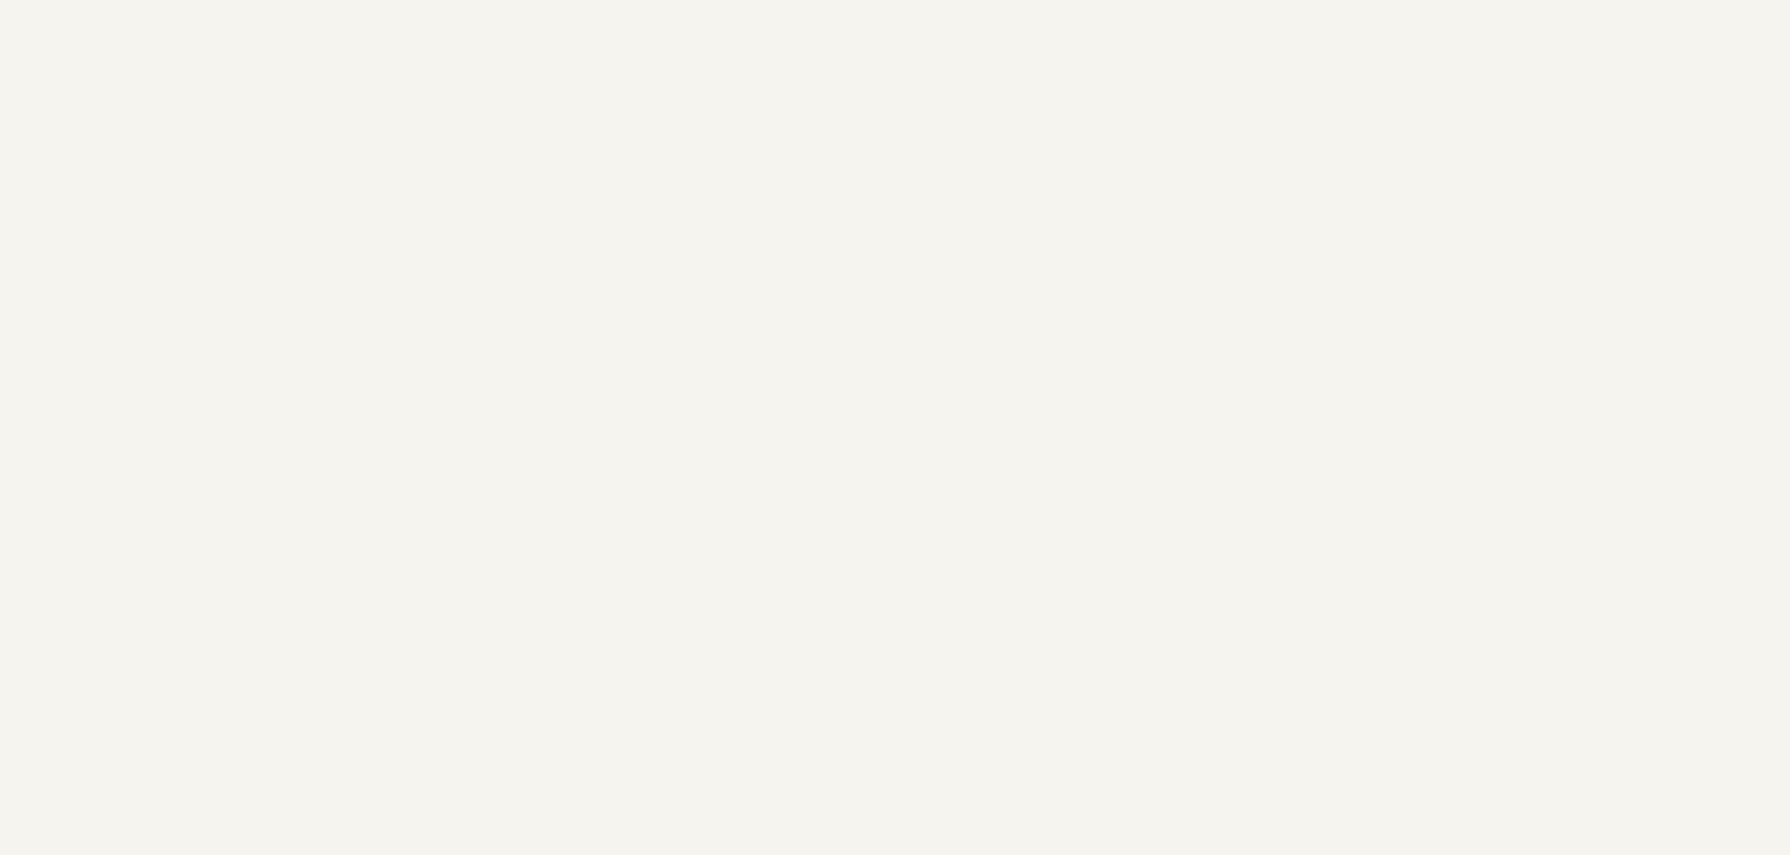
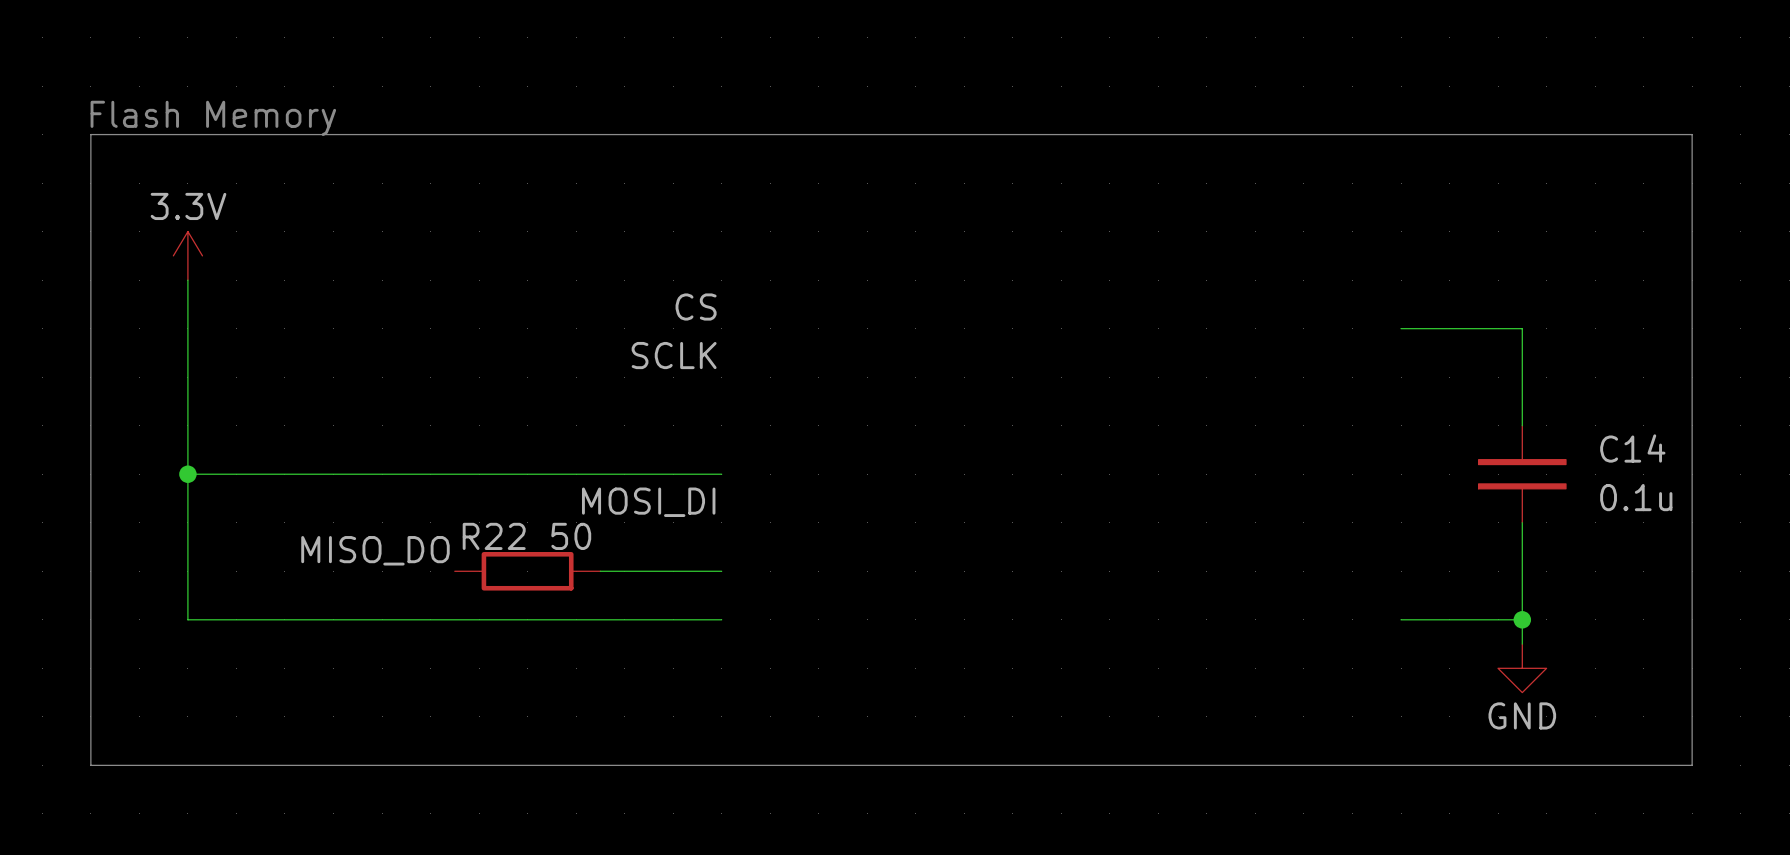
text: none -> Flash Memory (213, 118)
line: none -> (90, 134) (1692, 134) (1692, 765) (90, 765) (90, 134)
power symbol: none -> 3.3V (187, 255)
wire: none -> (187, 280) (187, 619) (721, 619)
label: none -> CS (696, 307)
wire: none -> (1401, 328) (1522, 328) (1522, 425)
label: none -> SCLK (674, 355)
wire: none -> (187, 474) (721, 474)
junction: none -> (187, 474)
C14: none -> 0.1u (1522, 474)
label: none -> MOSI_DI (648, 502)
wire: none -> (1522, 522) (1522, 644)
label: none -> MISO_DO (375, 550)
R22: none -> 50 (527, 571)
wire: none -> (600, 571) (721, 571)
wire: none -> (1401, 619) (1522, 619)
junction: none -> (1522, 619)
power symbol: none -> GND (1522, 668)

